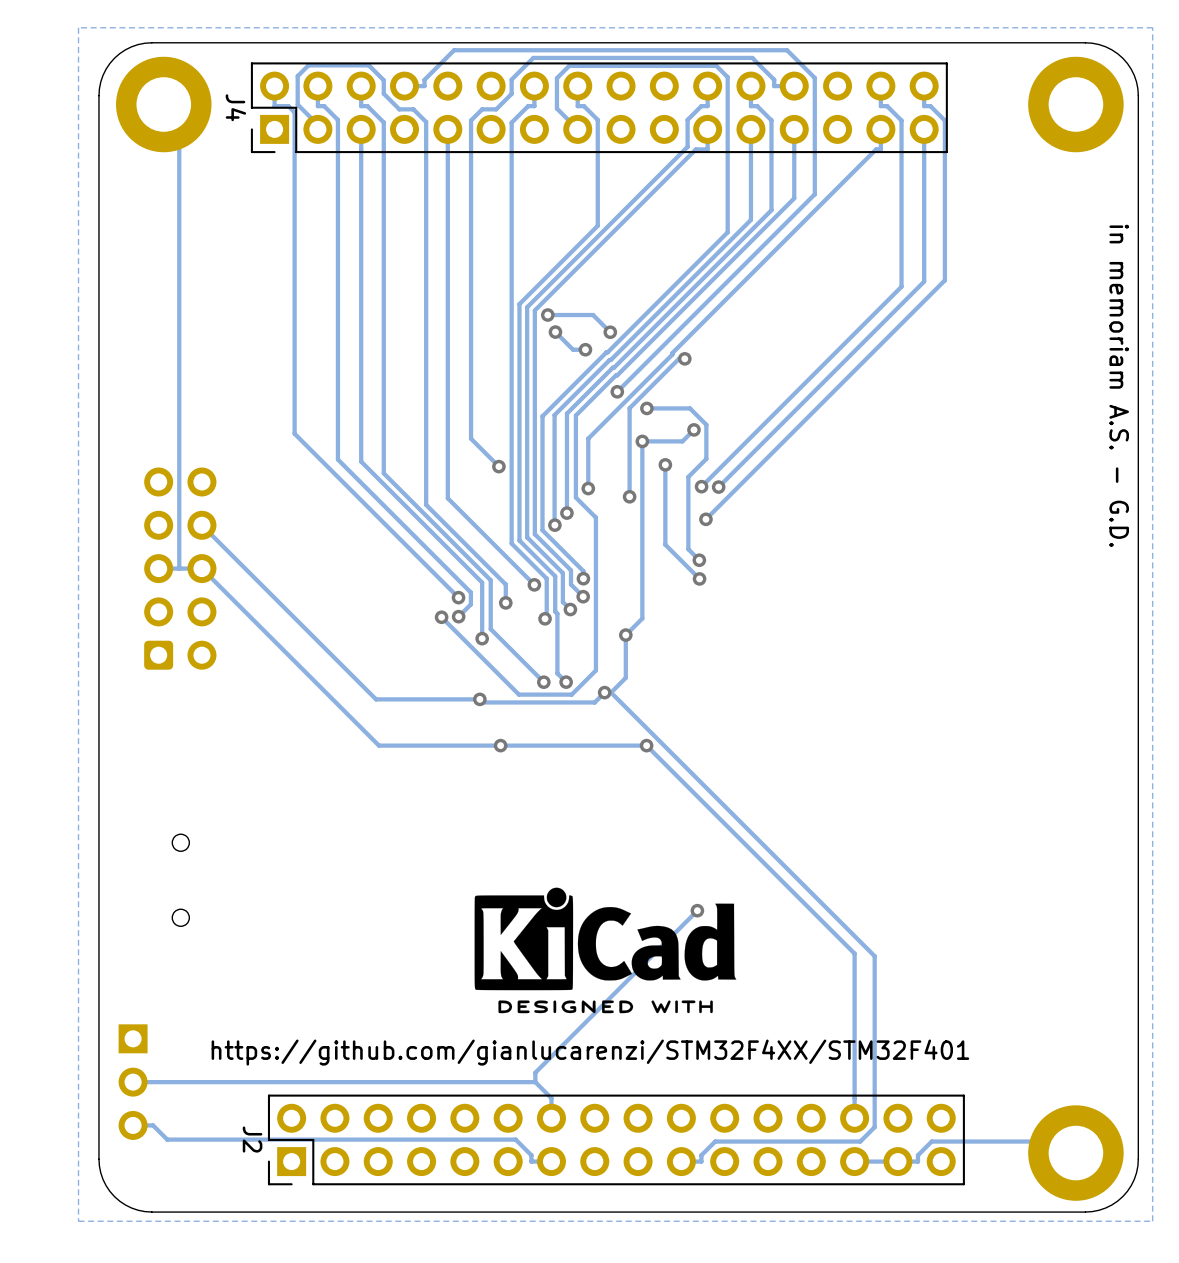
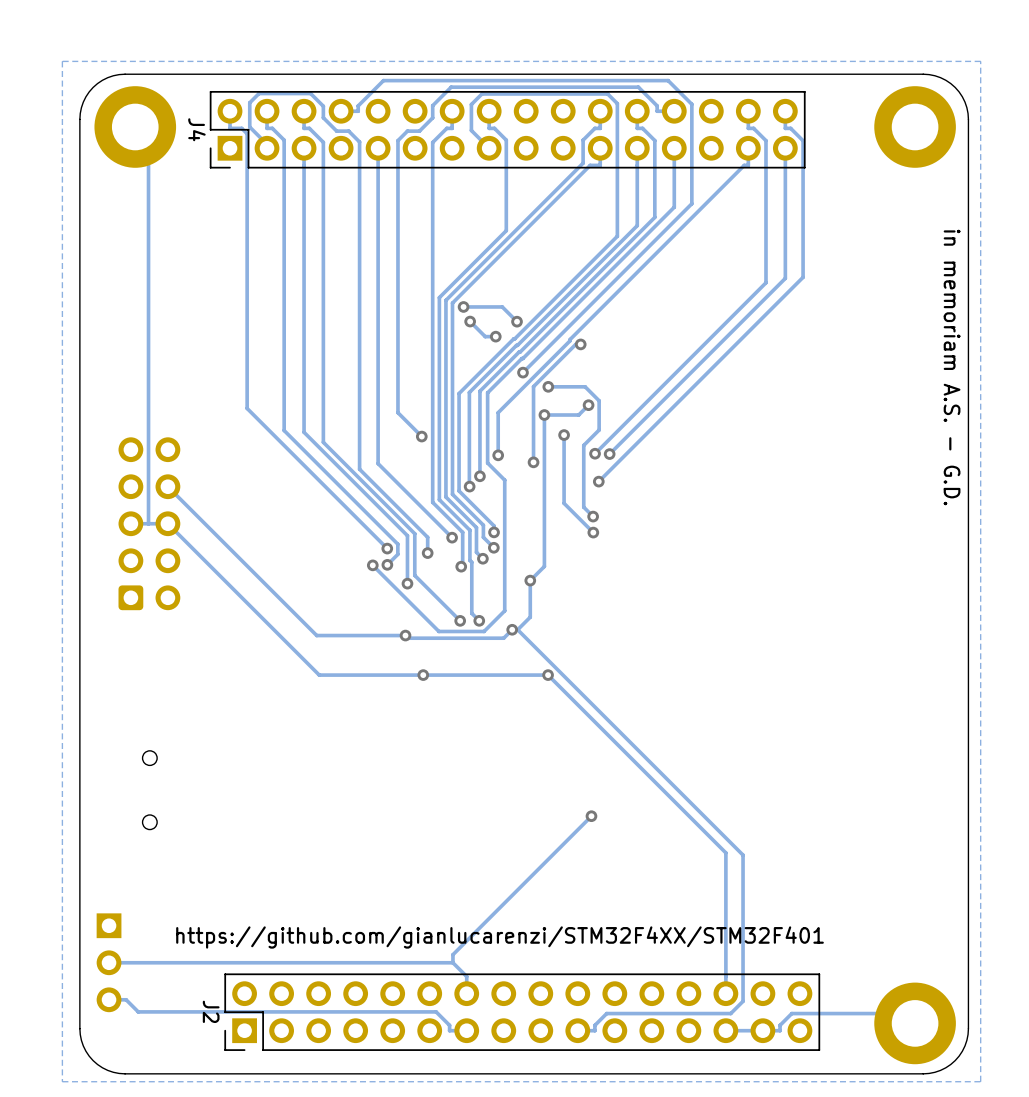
drawing: [474, 887, 737, 1014] -> none

